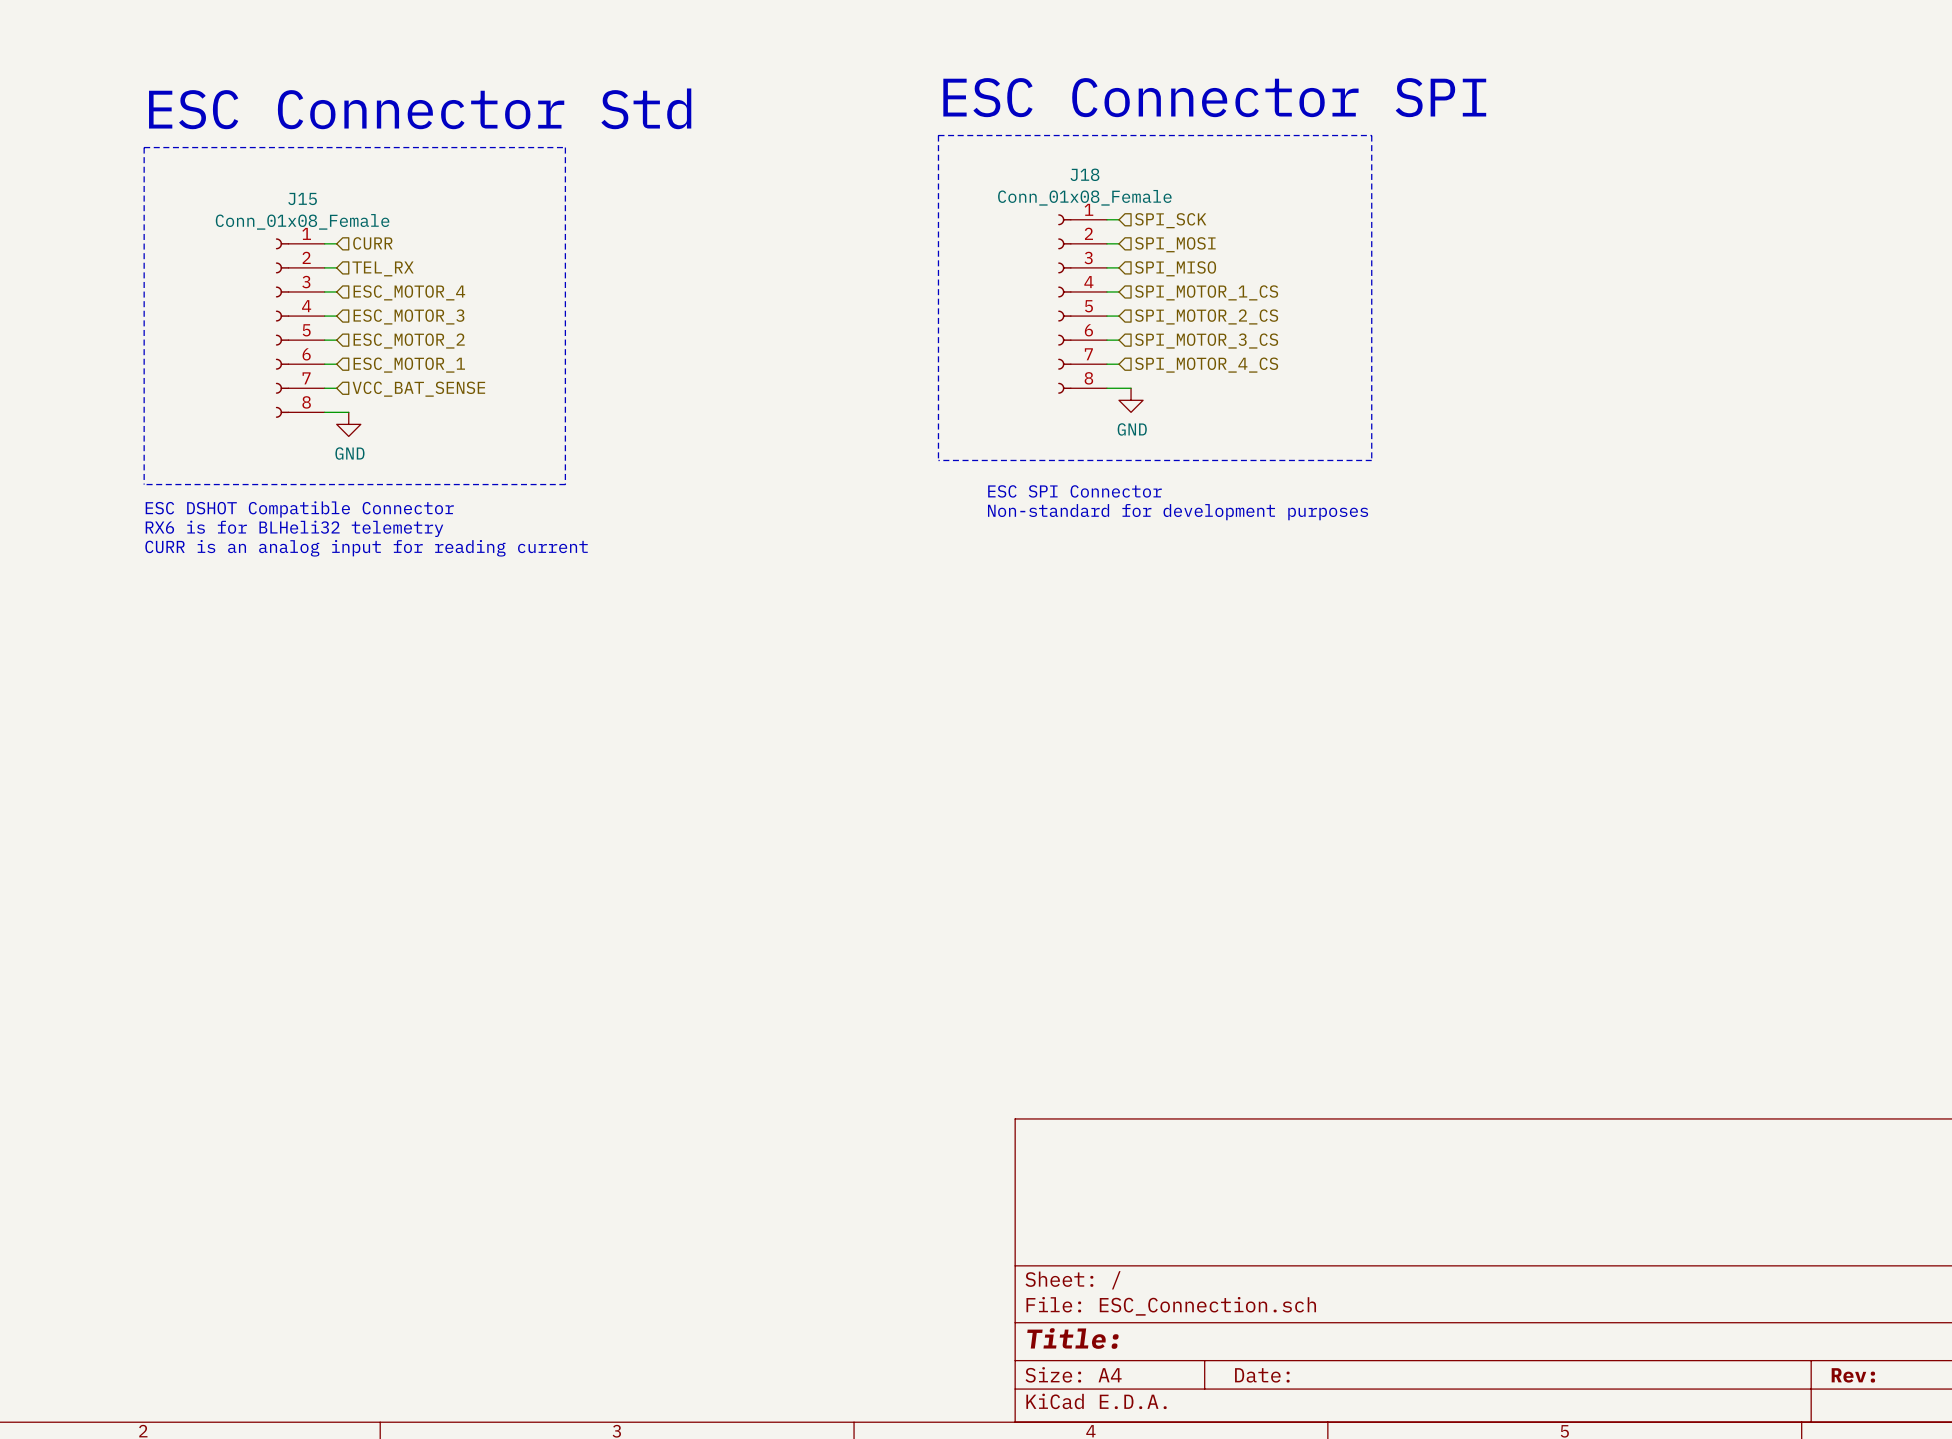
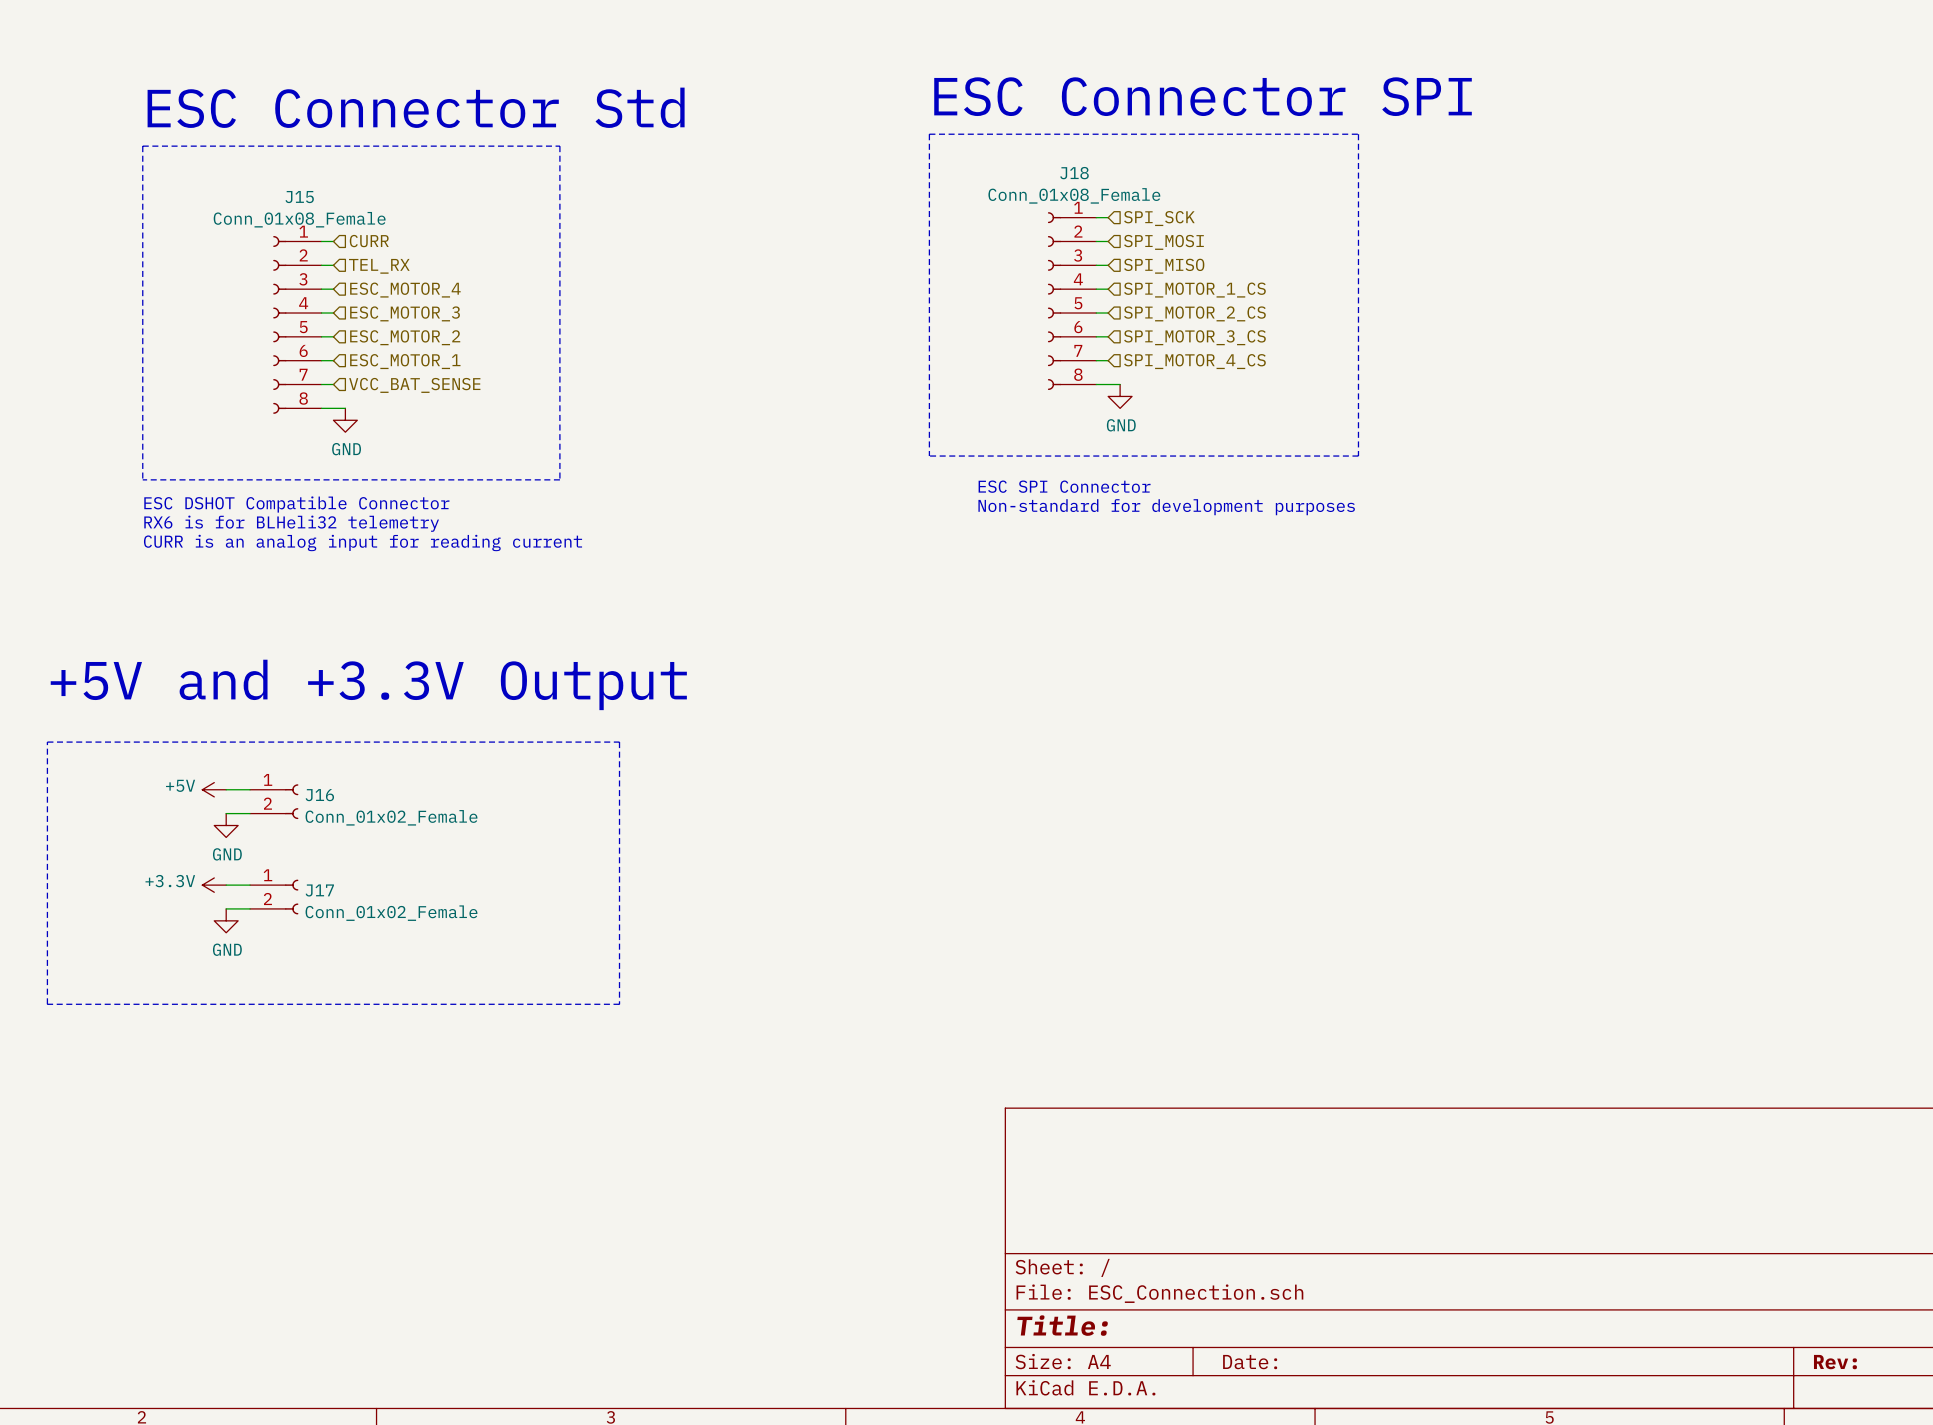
text: none -> +5V and +3.3V Output (368, 684)
line: none -> (47, 742) (619, 742) (619, 1004) (47, 1004) (47, 742)
power symbol: none -> +5V (214, 789)
wire: none -> (226, 789) (250, 789)
J16: none -> Conn_01x02_Female (274, 801)
wire: none -> (226, 813) (250, 813)
power symbol: none -> GND (226, 825)
power symbol: none -> +3.3V (214, 885)
wire: none -> (226, 885) (250, 885)
J17: none -> Conn_01x02_Female (274, 897)
wire: none -> (226, 908) (250, 908)
power symbol: none -> GND (226, 920)

